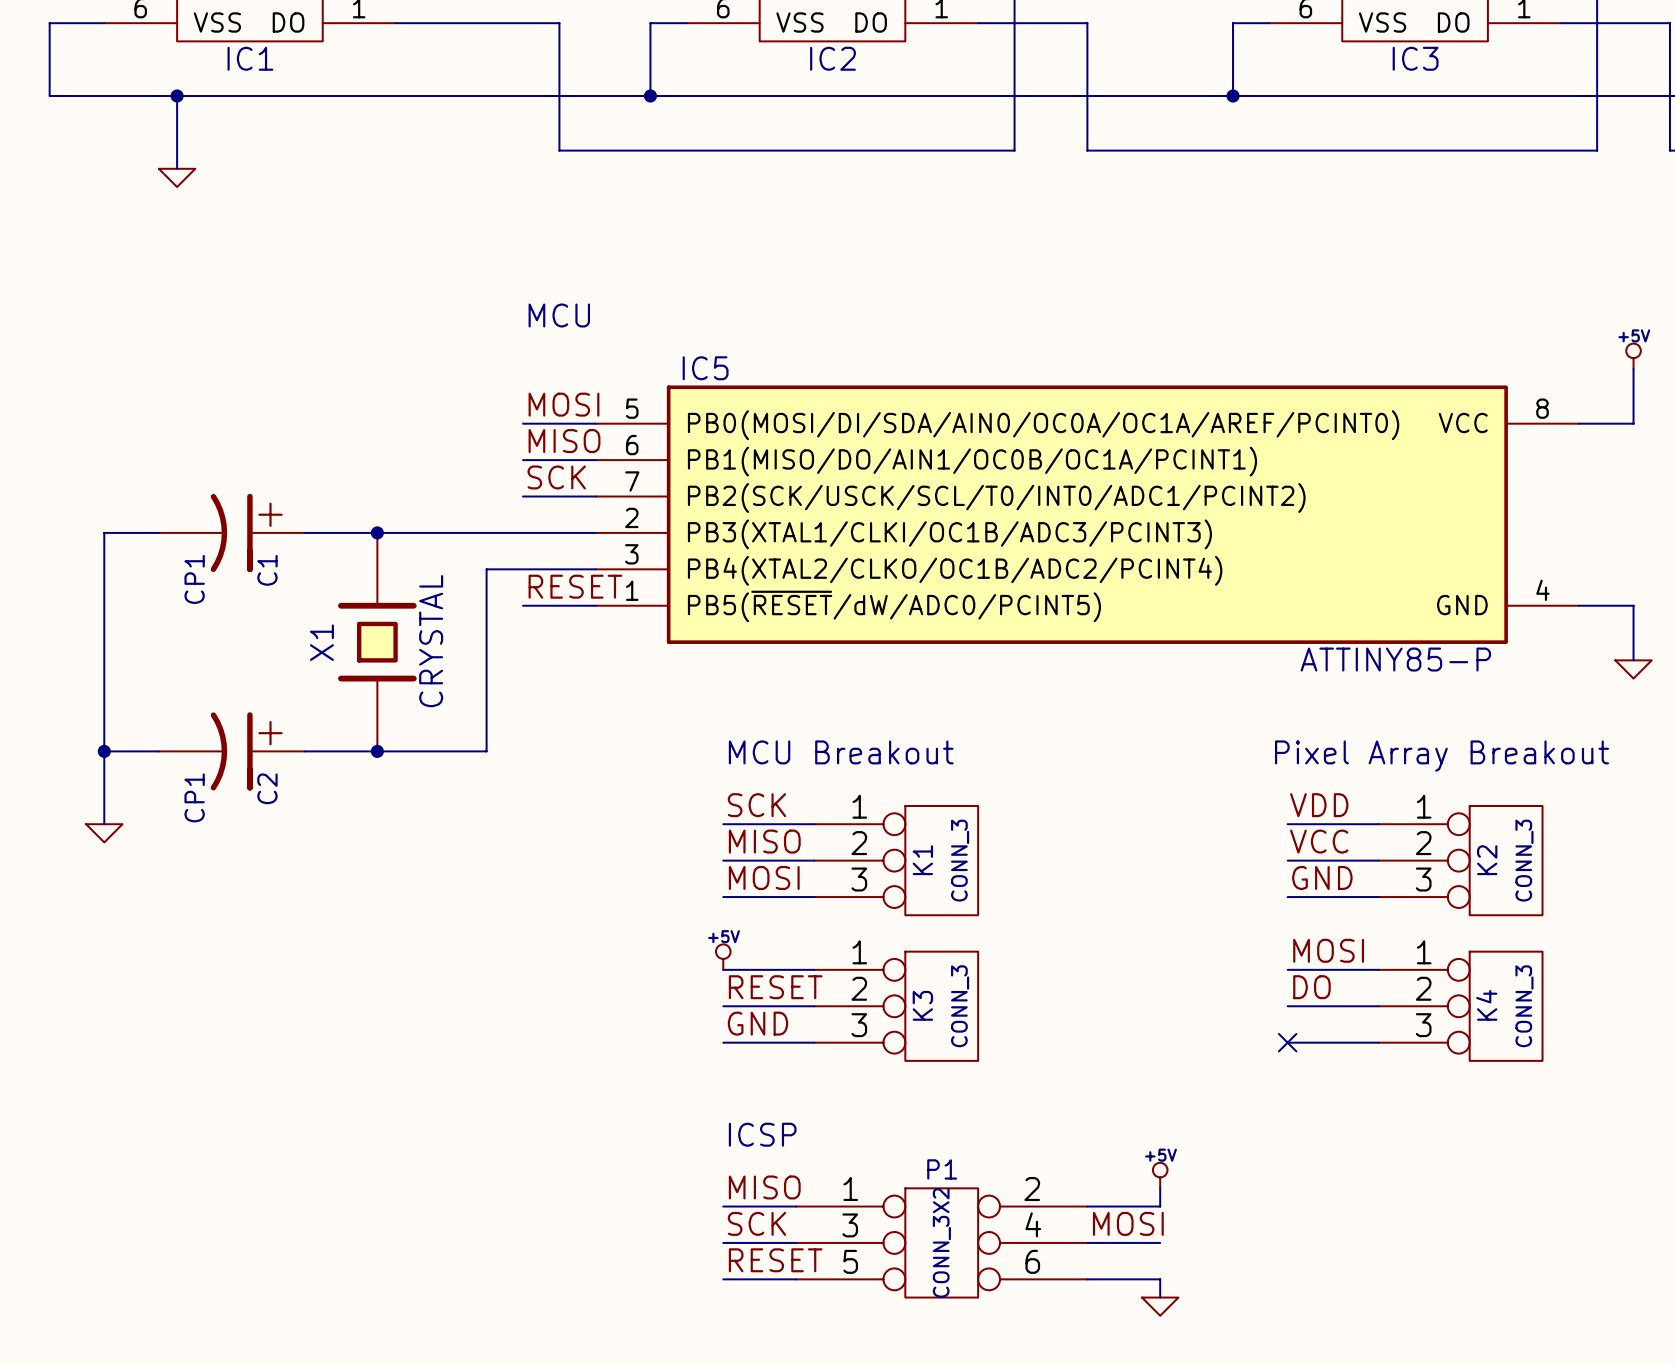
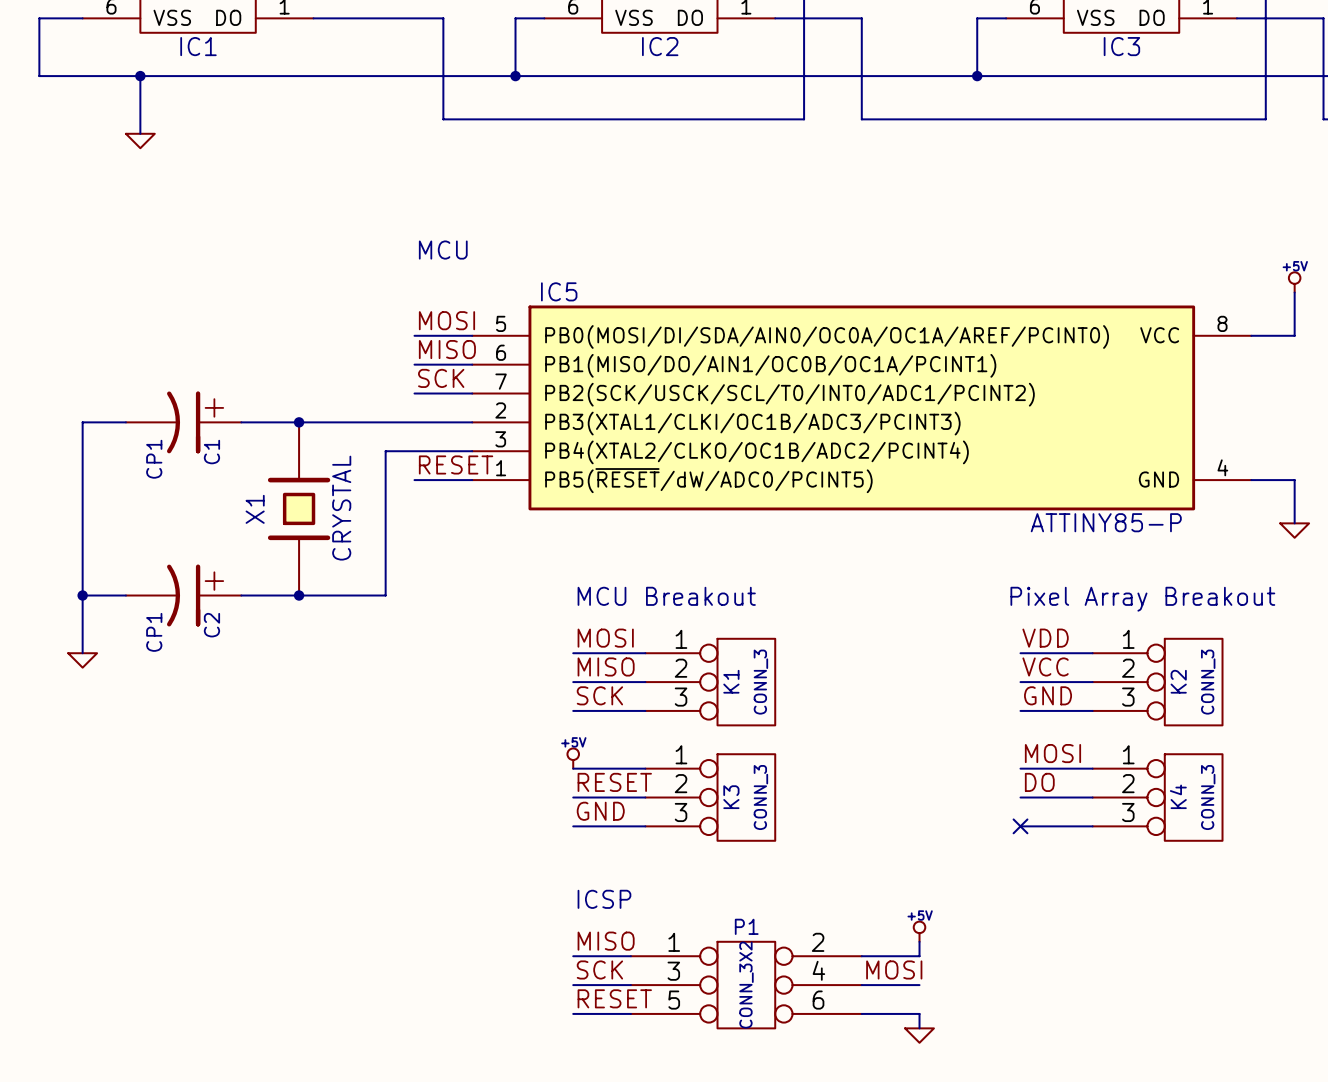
label: SCK (756, 805) -> MOSI (605, 638)
label: MOSI (764, 877) -> SCK (599, 695)

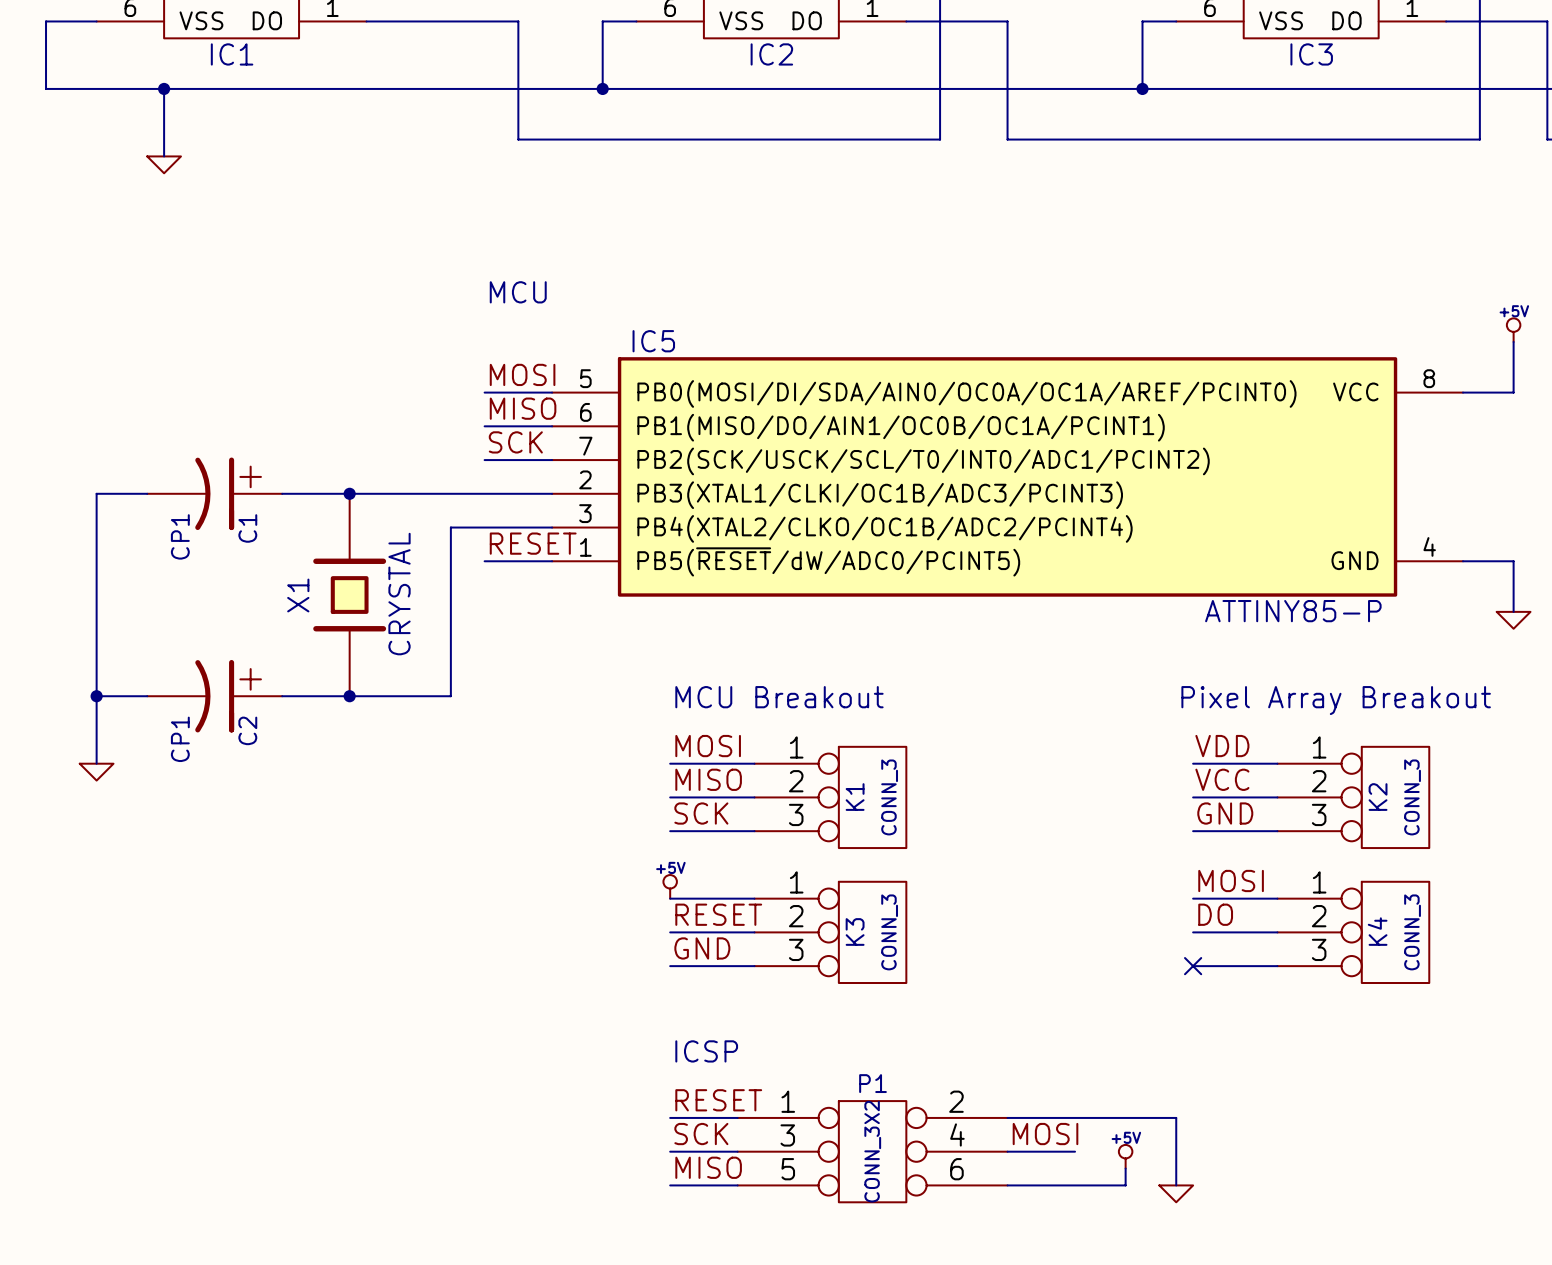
power symbol position: +5V (919, 931) -> +5V (1125, 1156)
label: MISO (606, 941) -> RESET (718, 1100)
wire: (919, 941) (919, 956) -> (1176, 1185) (1176, 1117) (1075, 1117)
label: RESET (614, 998) -> MISO (708, 1167)
wire: (919, 1013) (919, 1028) -> (1075, 1185) (1125, 1185) (1125, 1168)
power symbol position: (919, 1035) -> (1176, 1193)

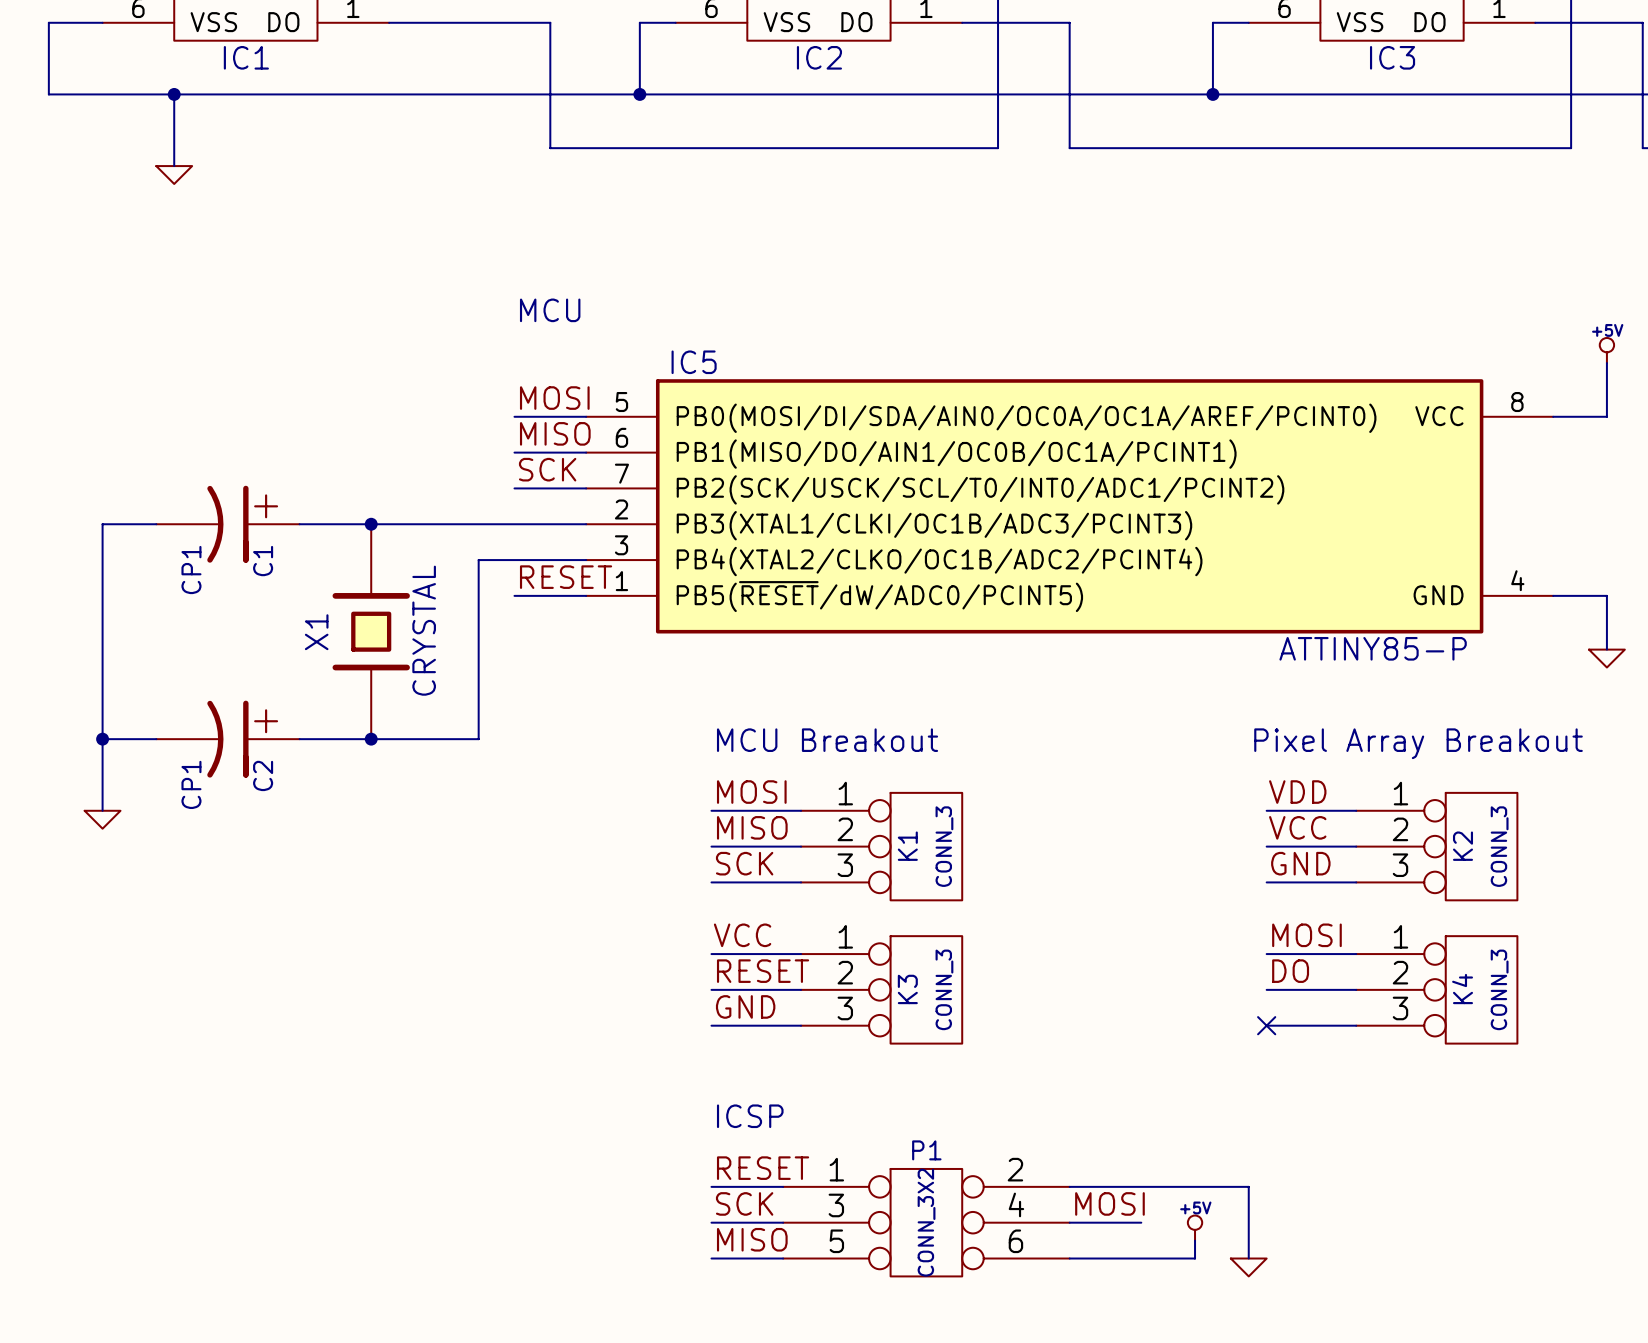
label: none -> VCC (742, 935)
power symbol: +5V (670, 886) -> none

